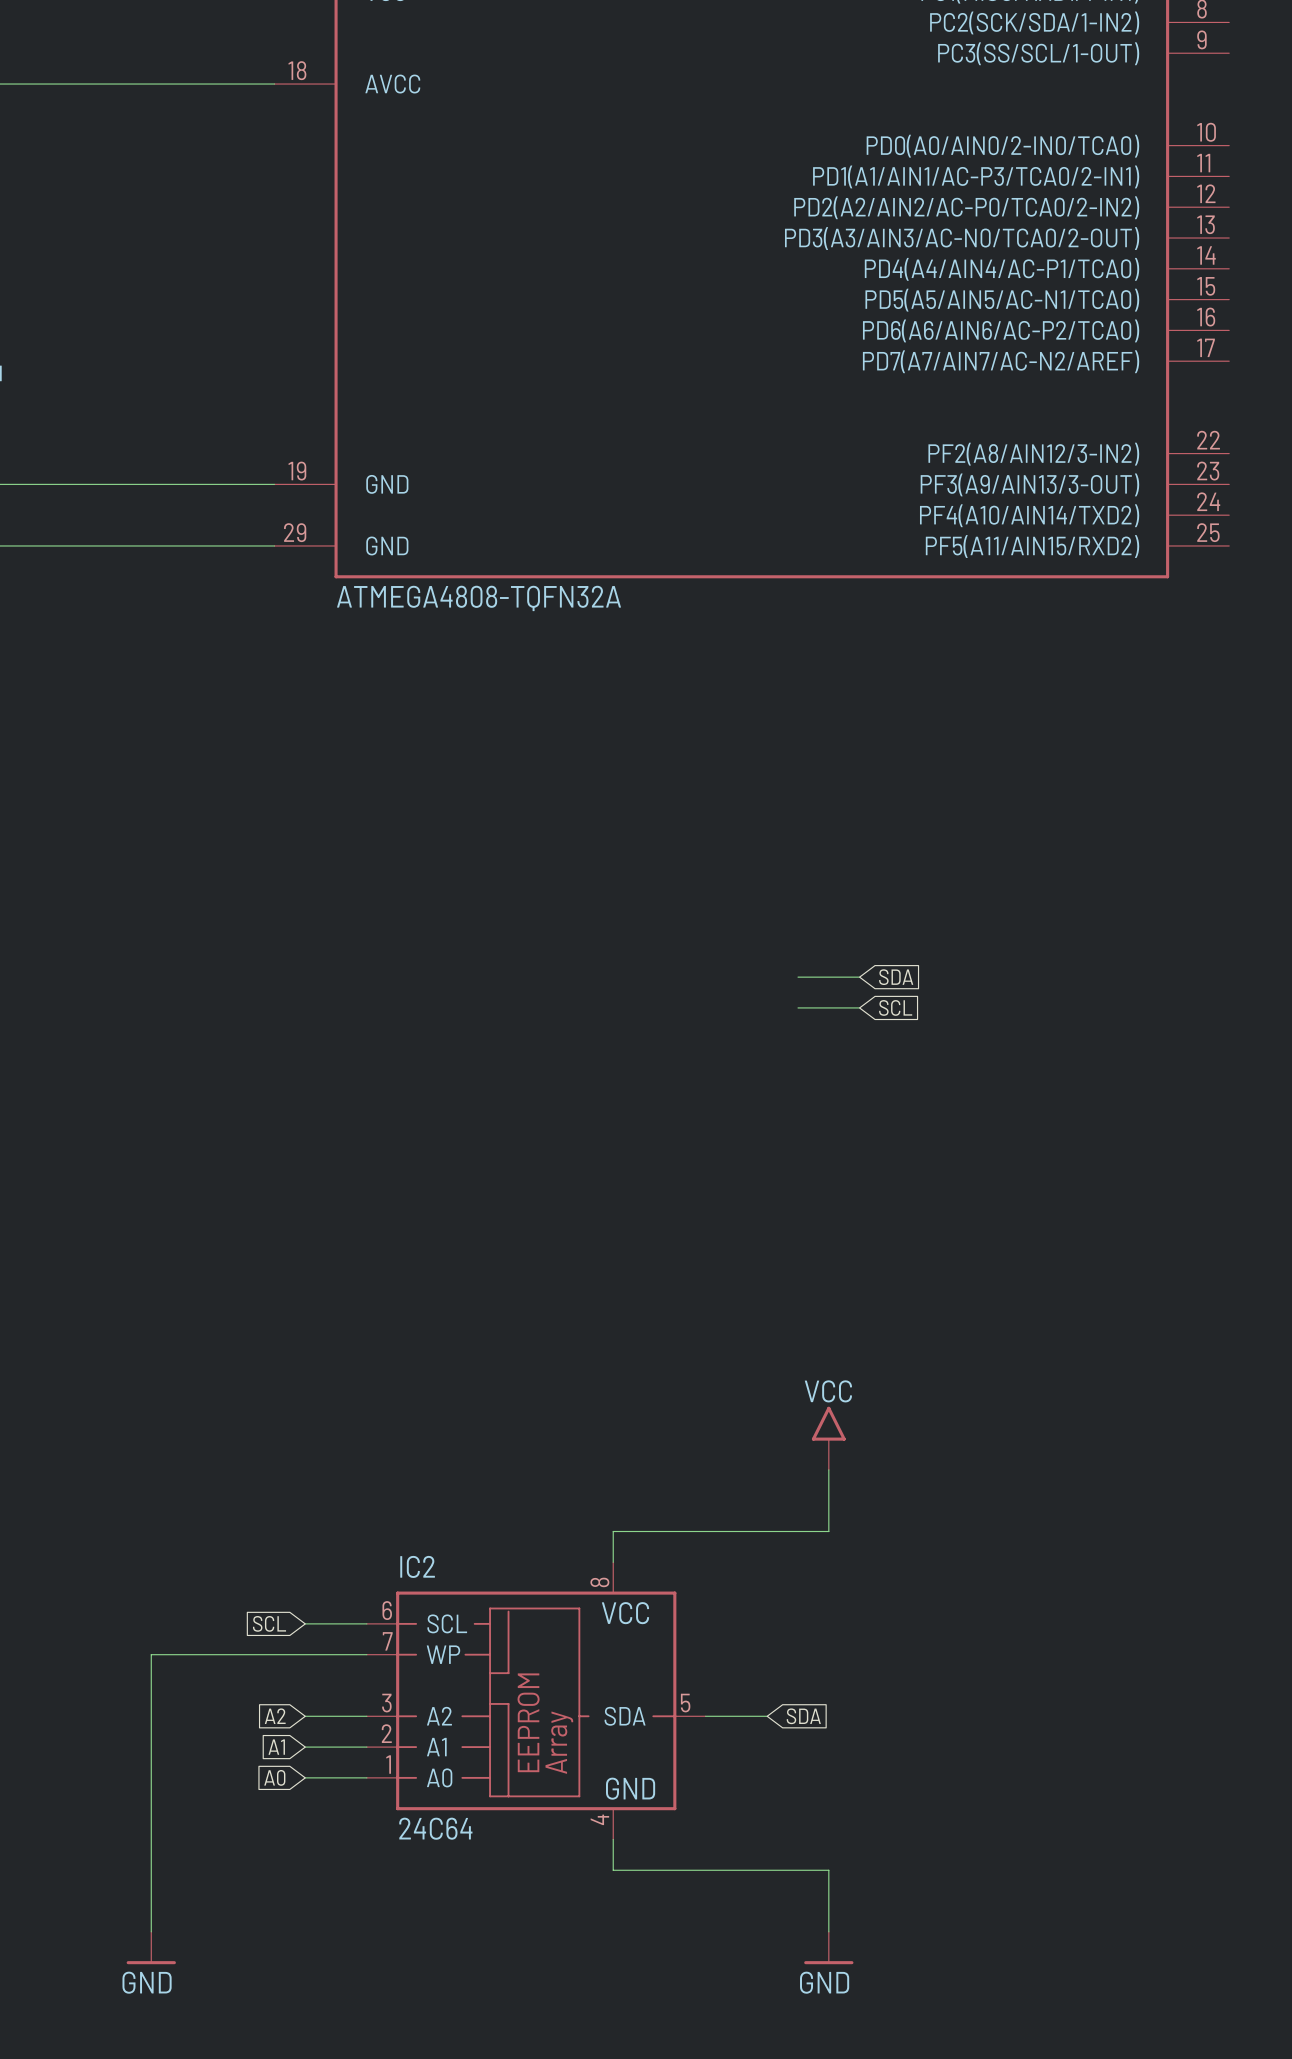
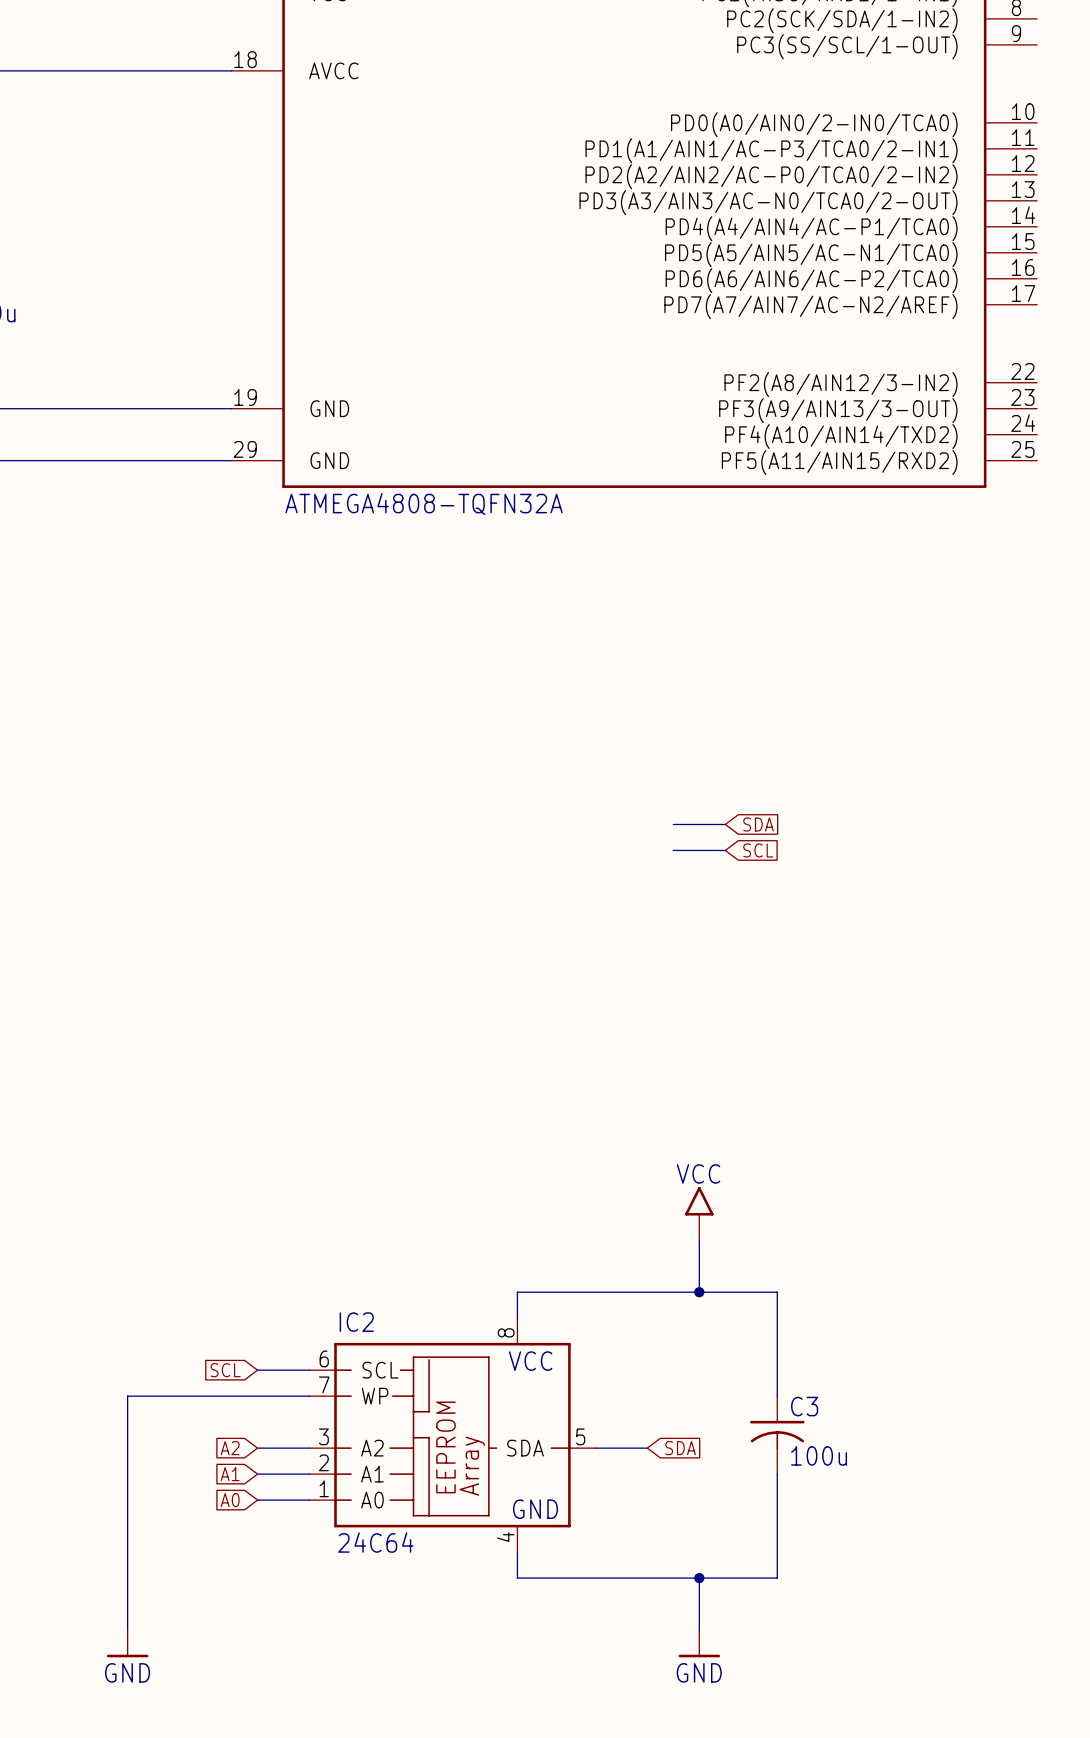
wire: none -> (699, 1292) (777, 1292) (777, 1396)
junction: none -> (699, 1292)
C3: none -> 100u (777, 1435)
wire: none -> (777, 1474) (777, 1578) (699, 1578)
junction: none -> (699, 1578)

